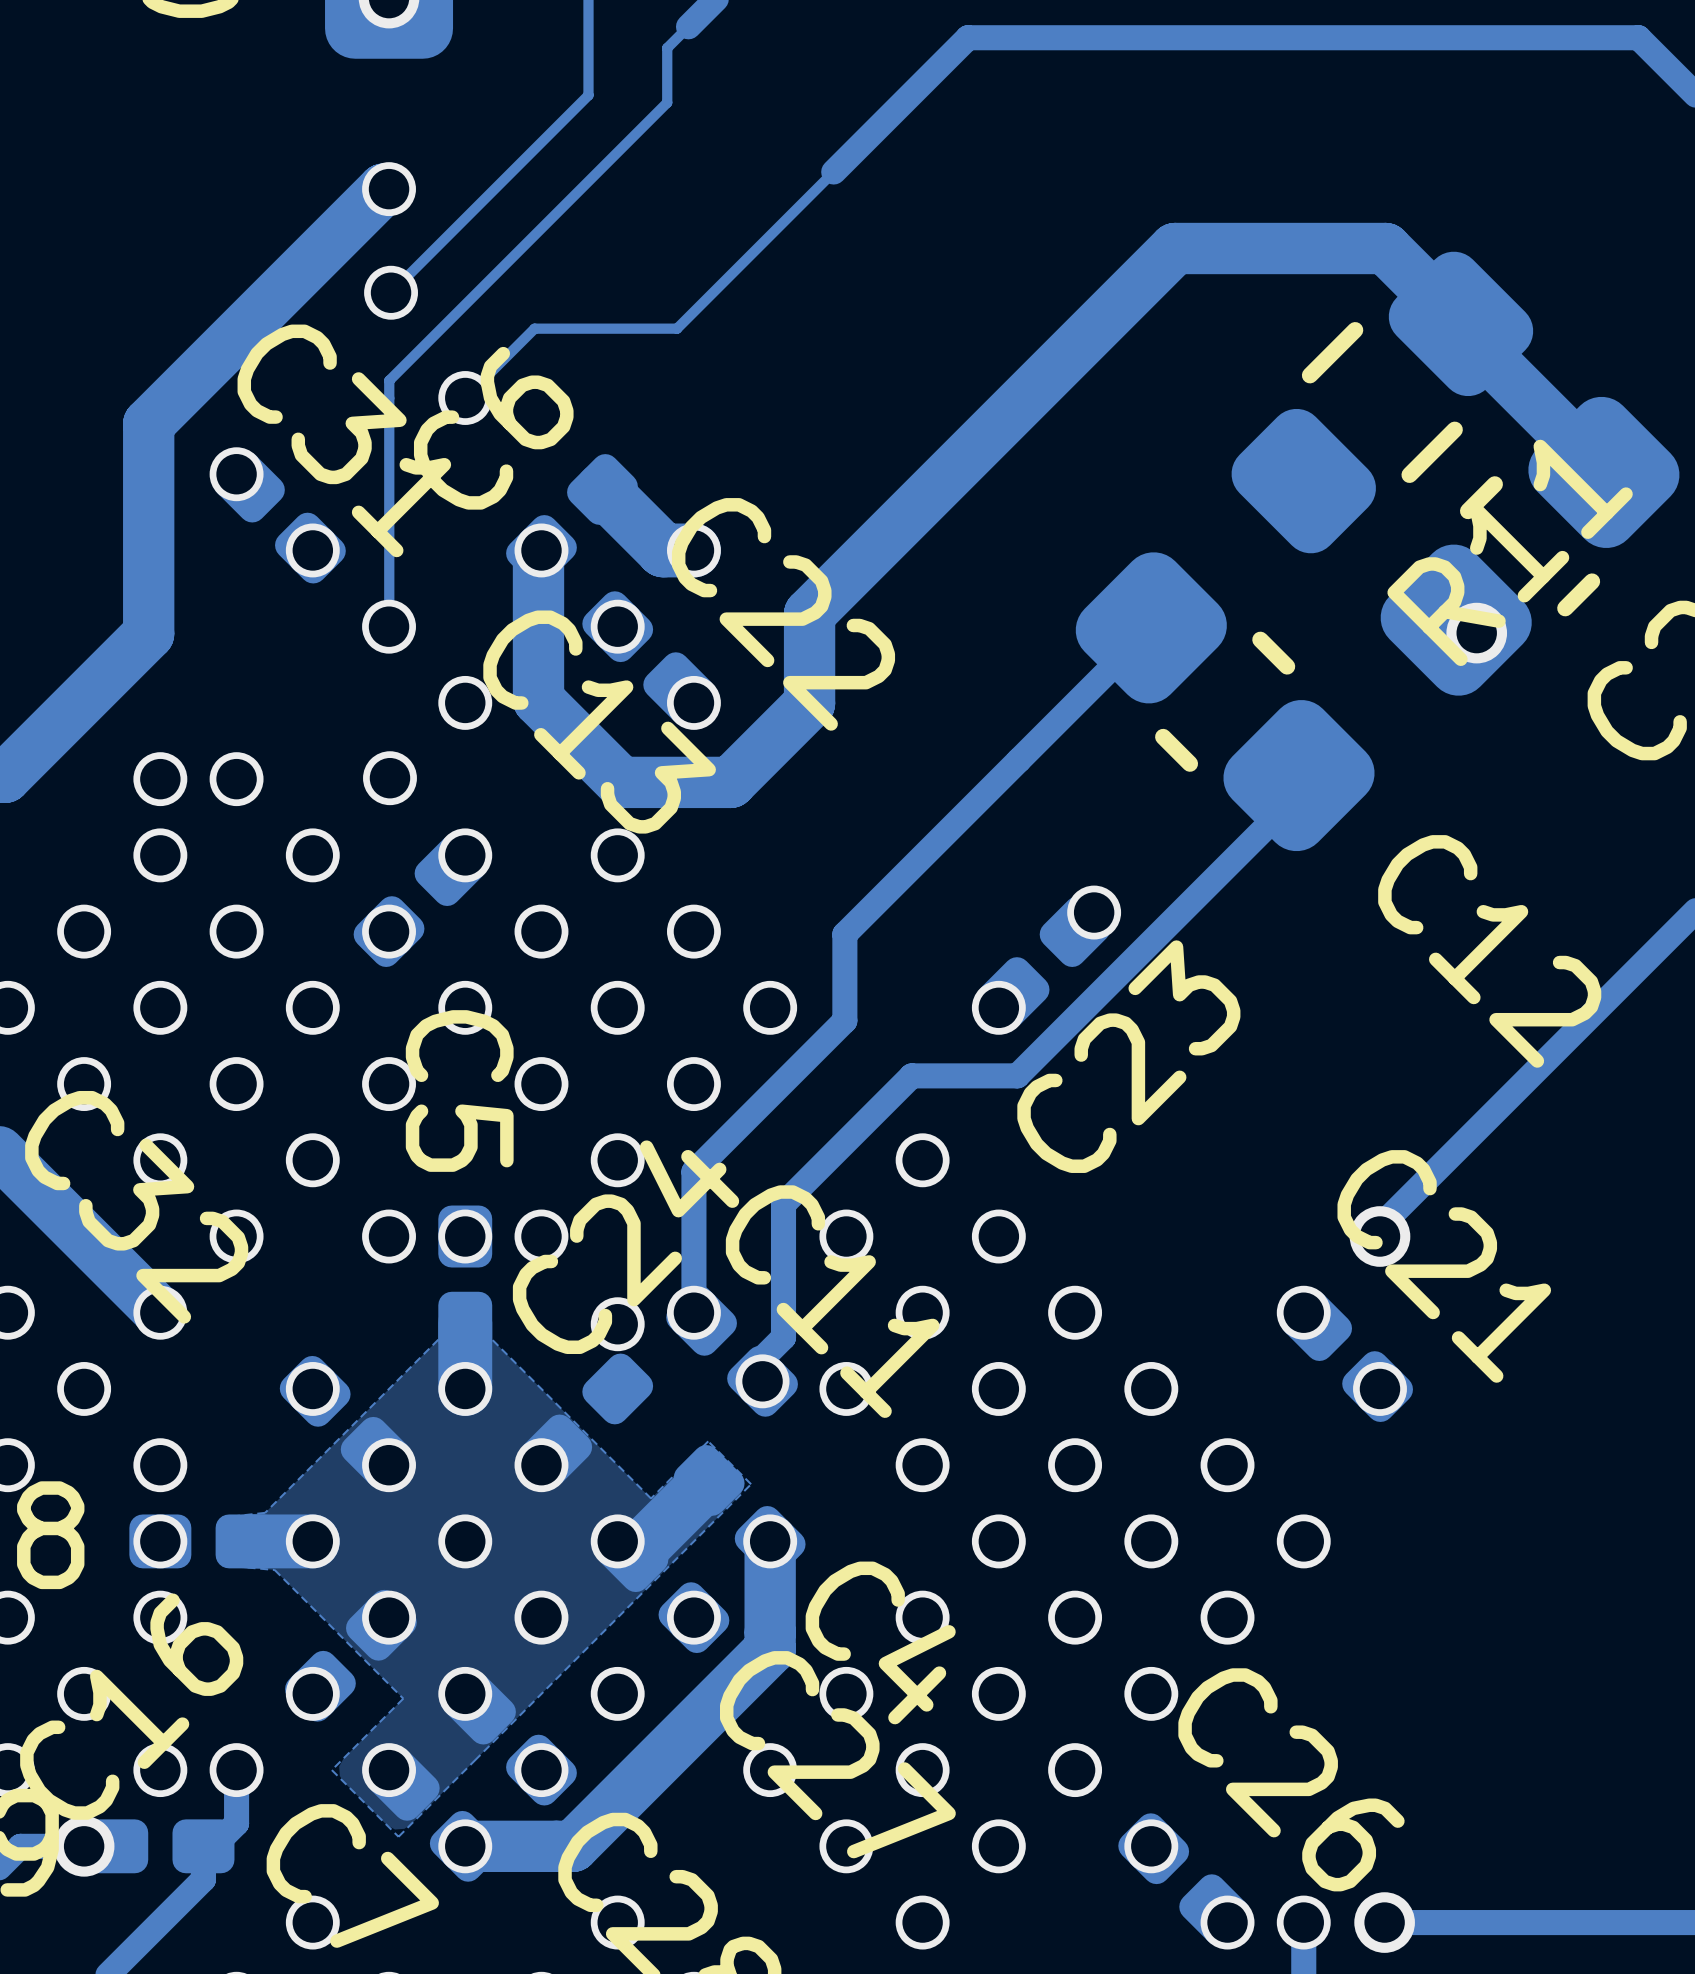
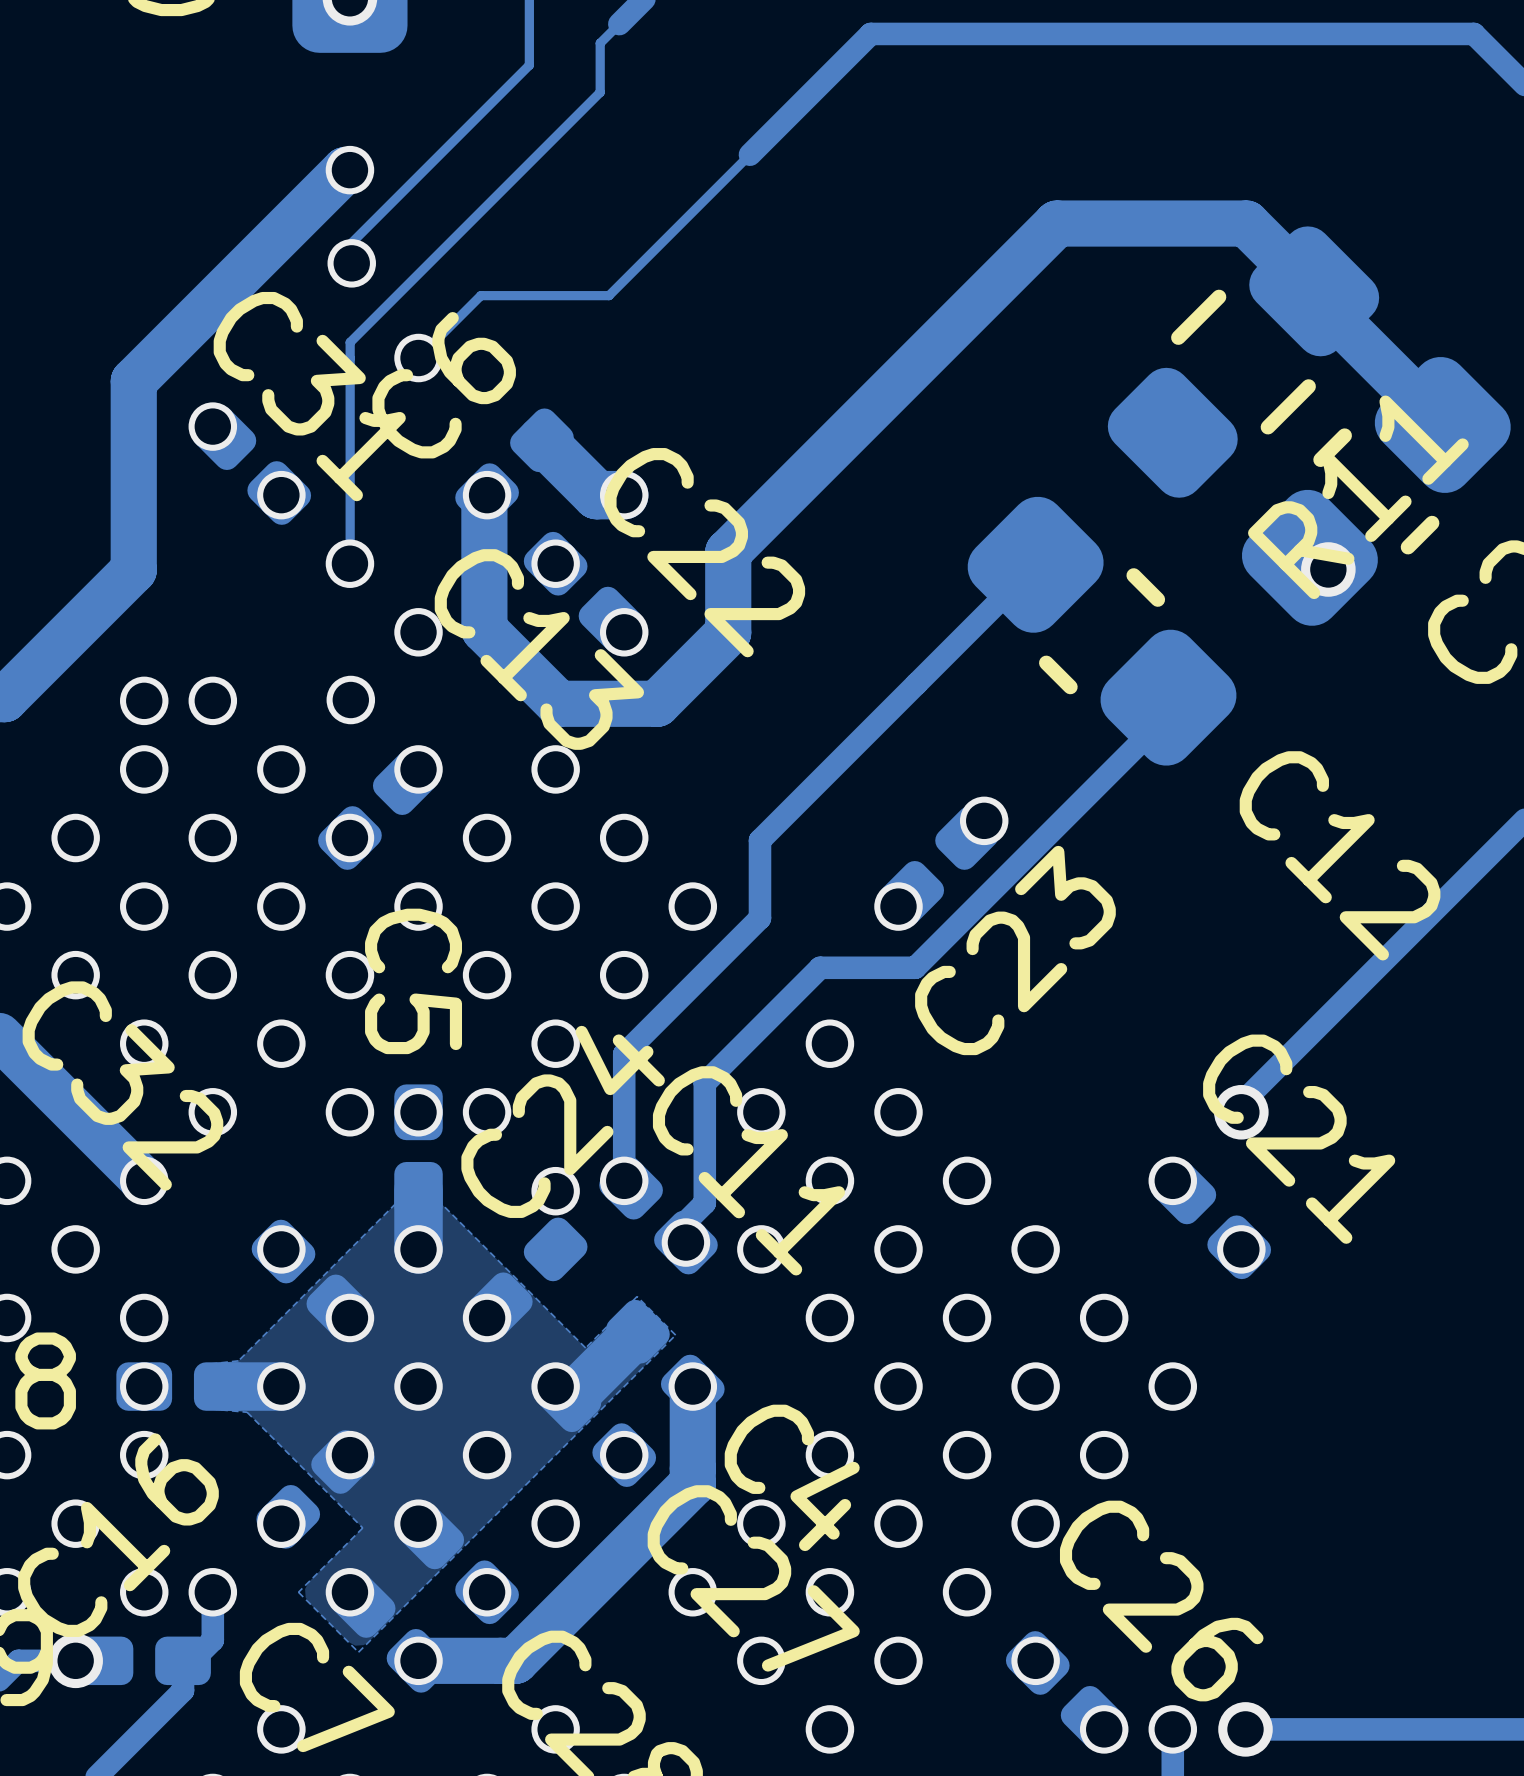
track: (588, 72) (588, 95) (389, 294) (389, 303) (383, 308) -> (529, 65) (344, 249) (344, 277)

